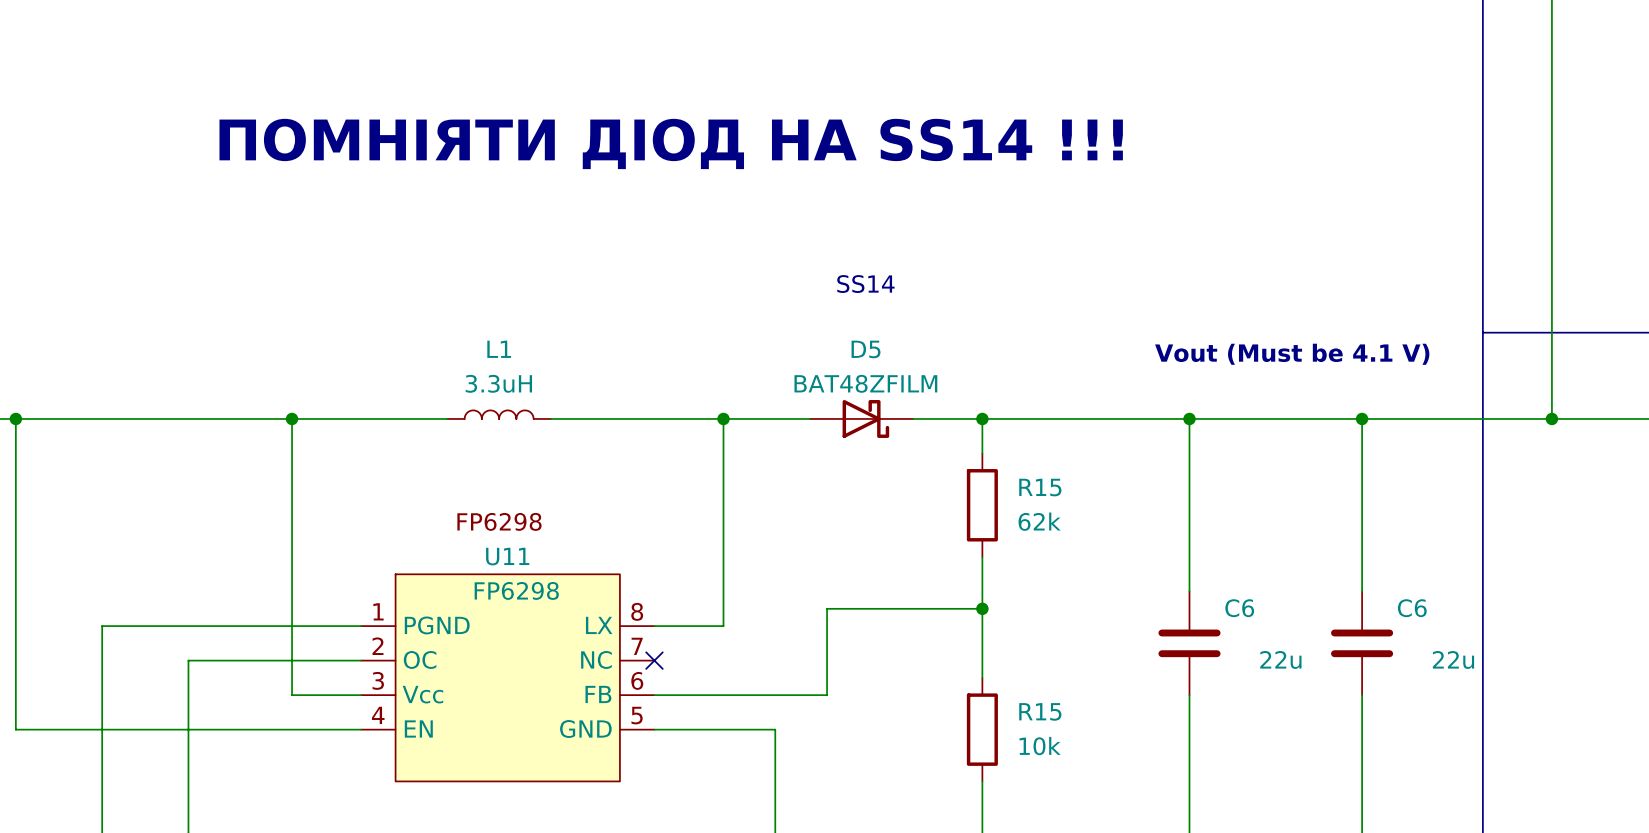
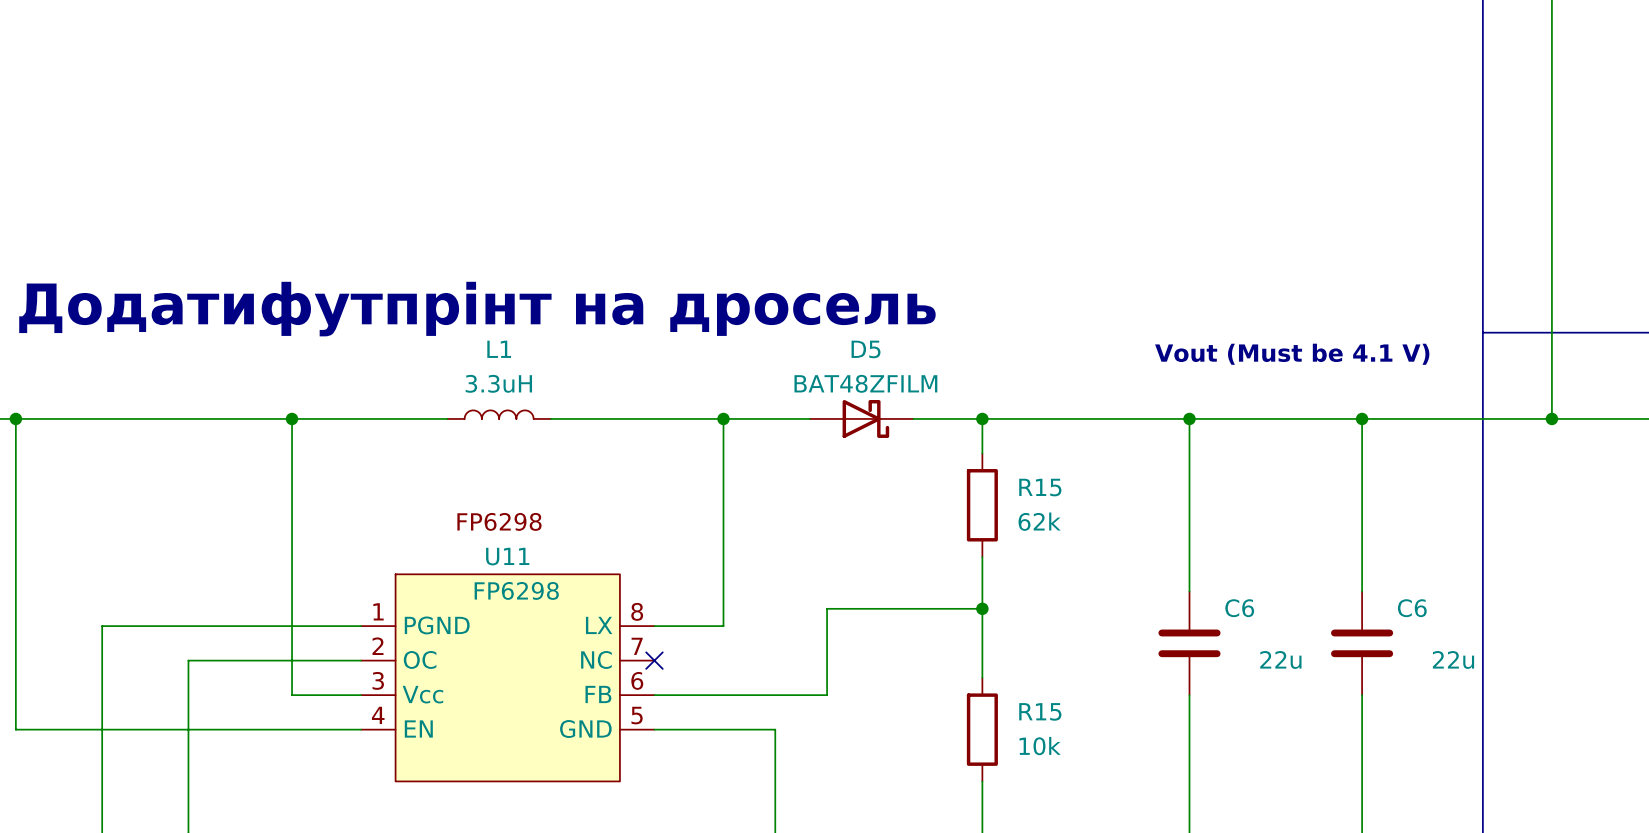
text: ПОМНІЯТИ ДІОД НА SS14 !!! (671, 143) -> none
text: SS14 (865, 284) -> none
text: none -> Додатифутпрінт на дросель (477, 309)

